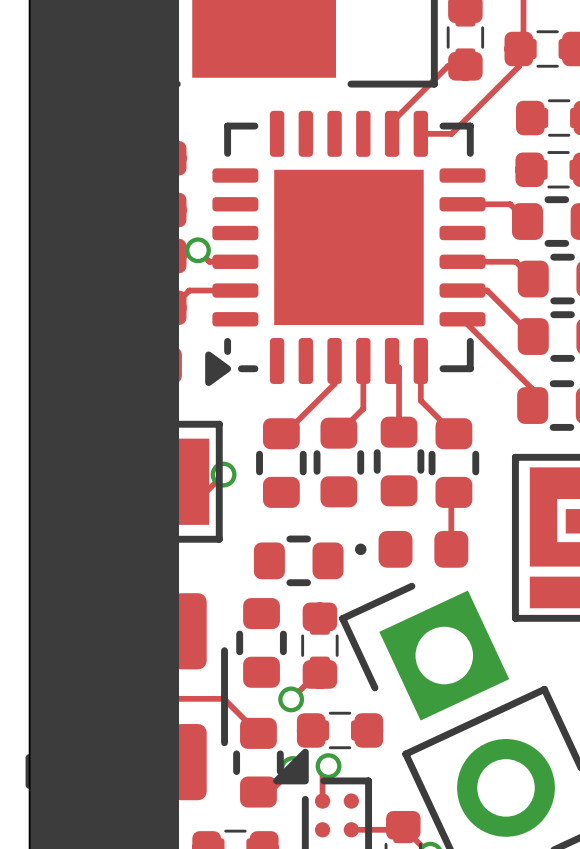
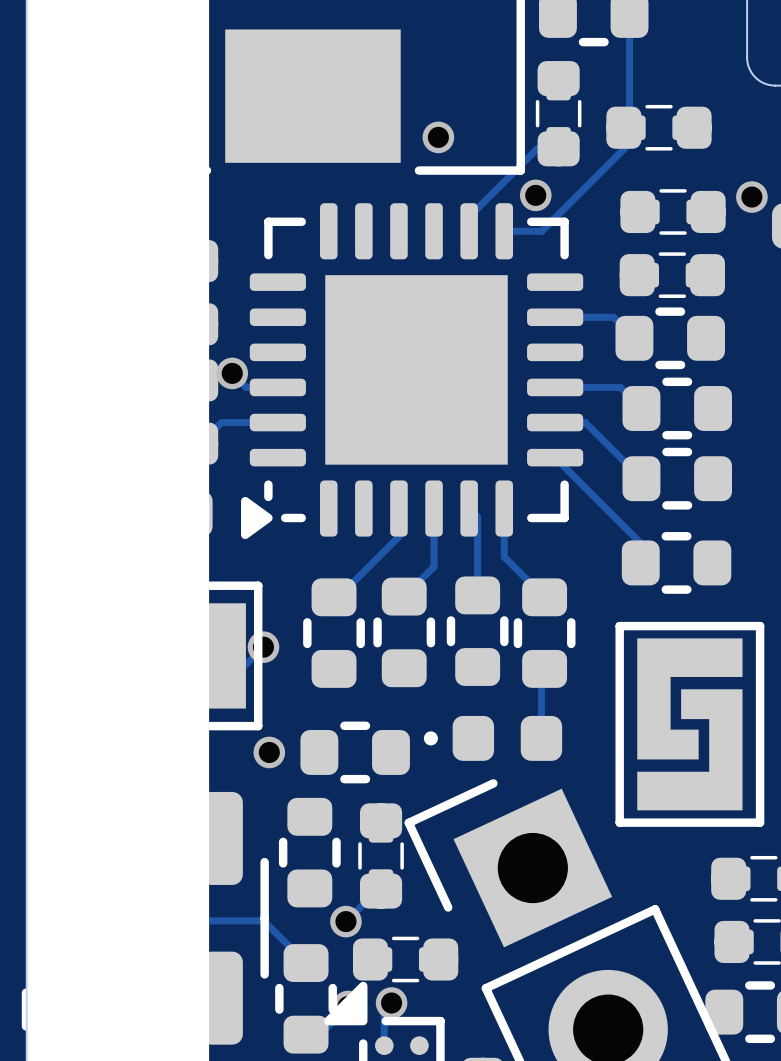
via: none -> (438, 137)
via: none -> (535, 195)
via: none -> (269, 752)

